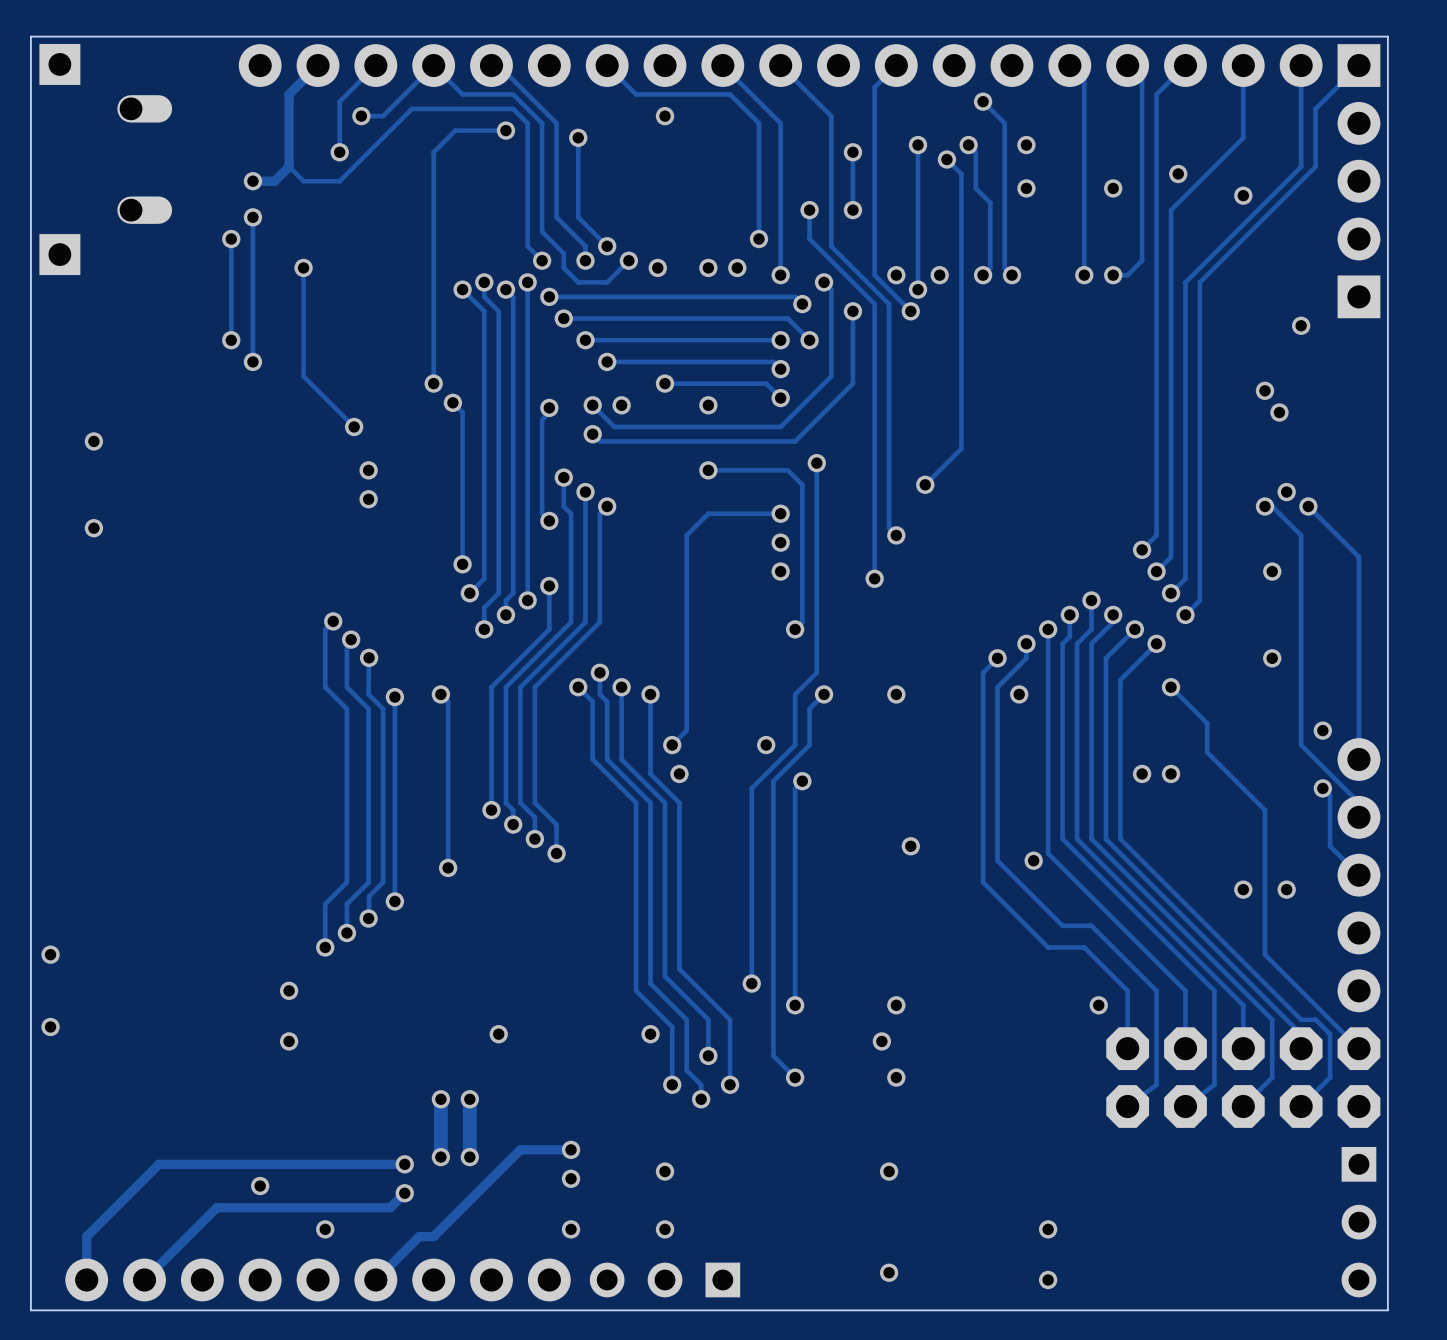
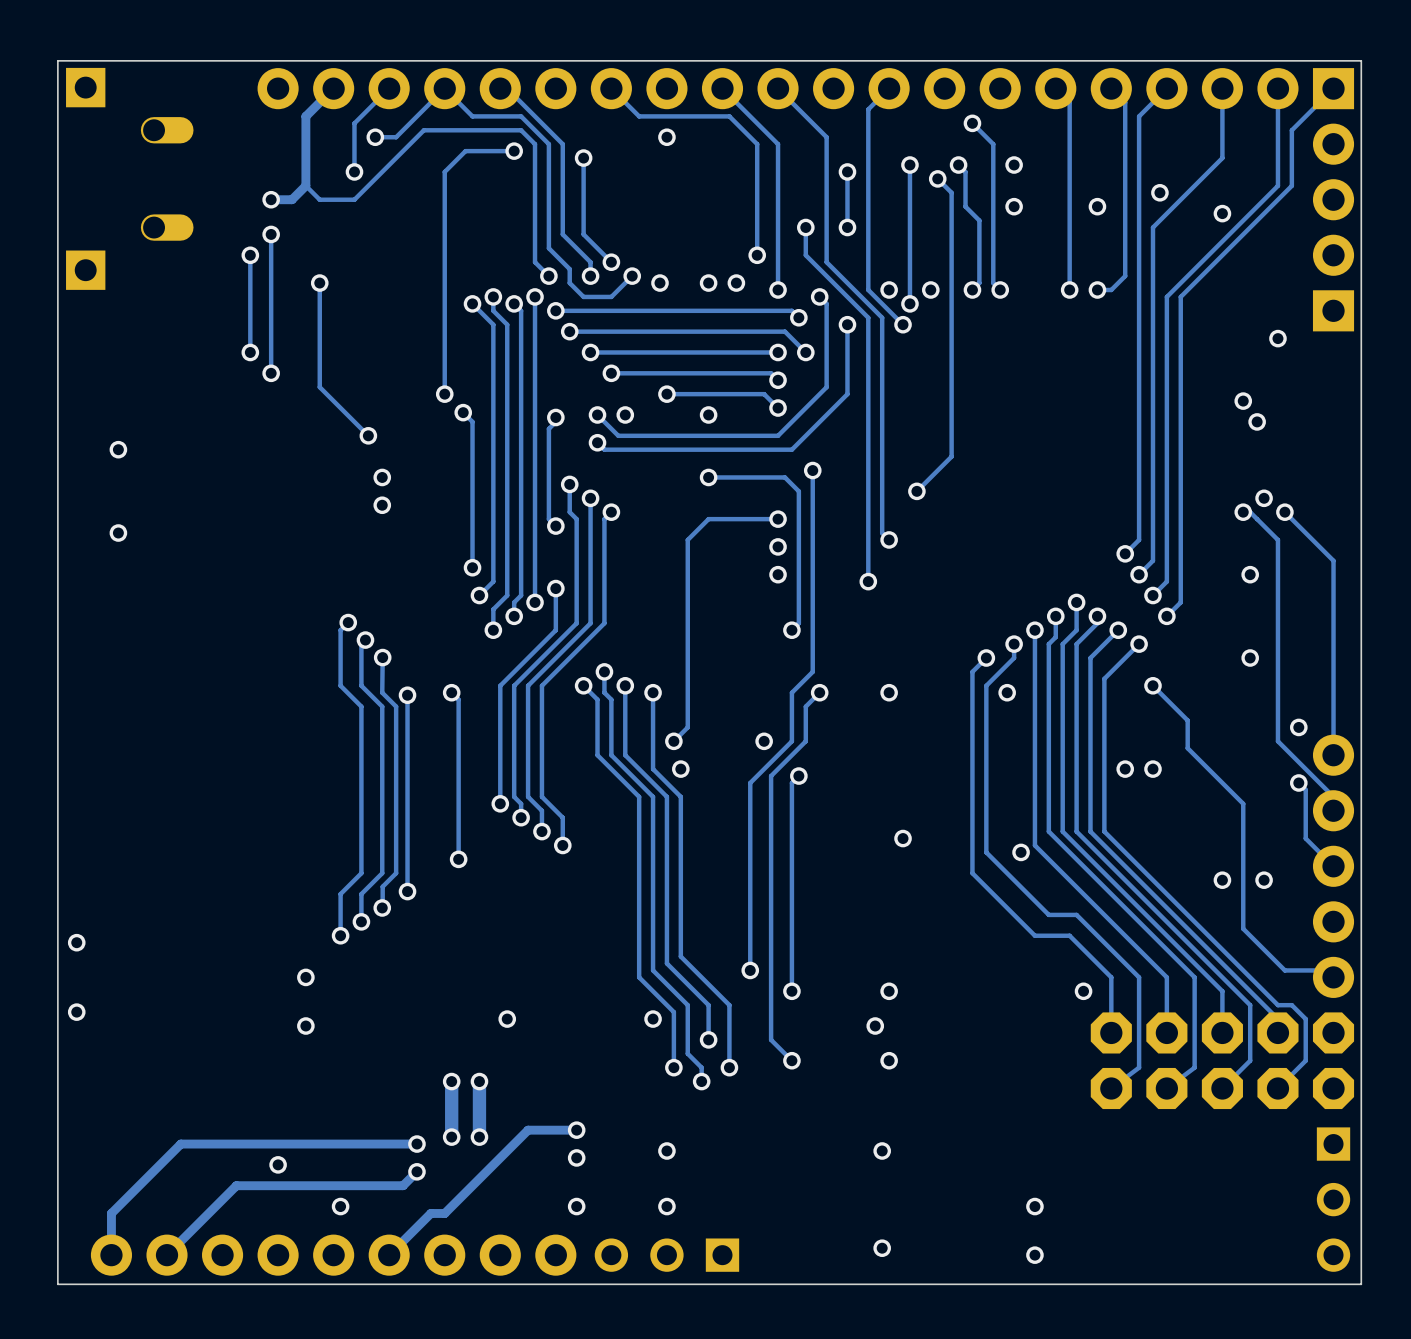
track: (1265, 940) (1265, 954) (1358, 1048) -> (1243, 928) (1284, 970) (1326, 970) (1333, 977)

